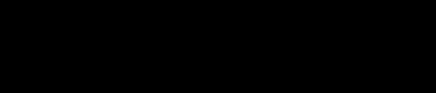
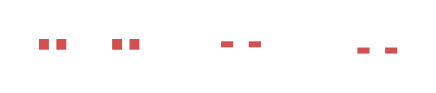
part: none -> (52, 44)
part: none -> (125, 44)
part: none -> (241, 44)
part: none -> (377, 50)

